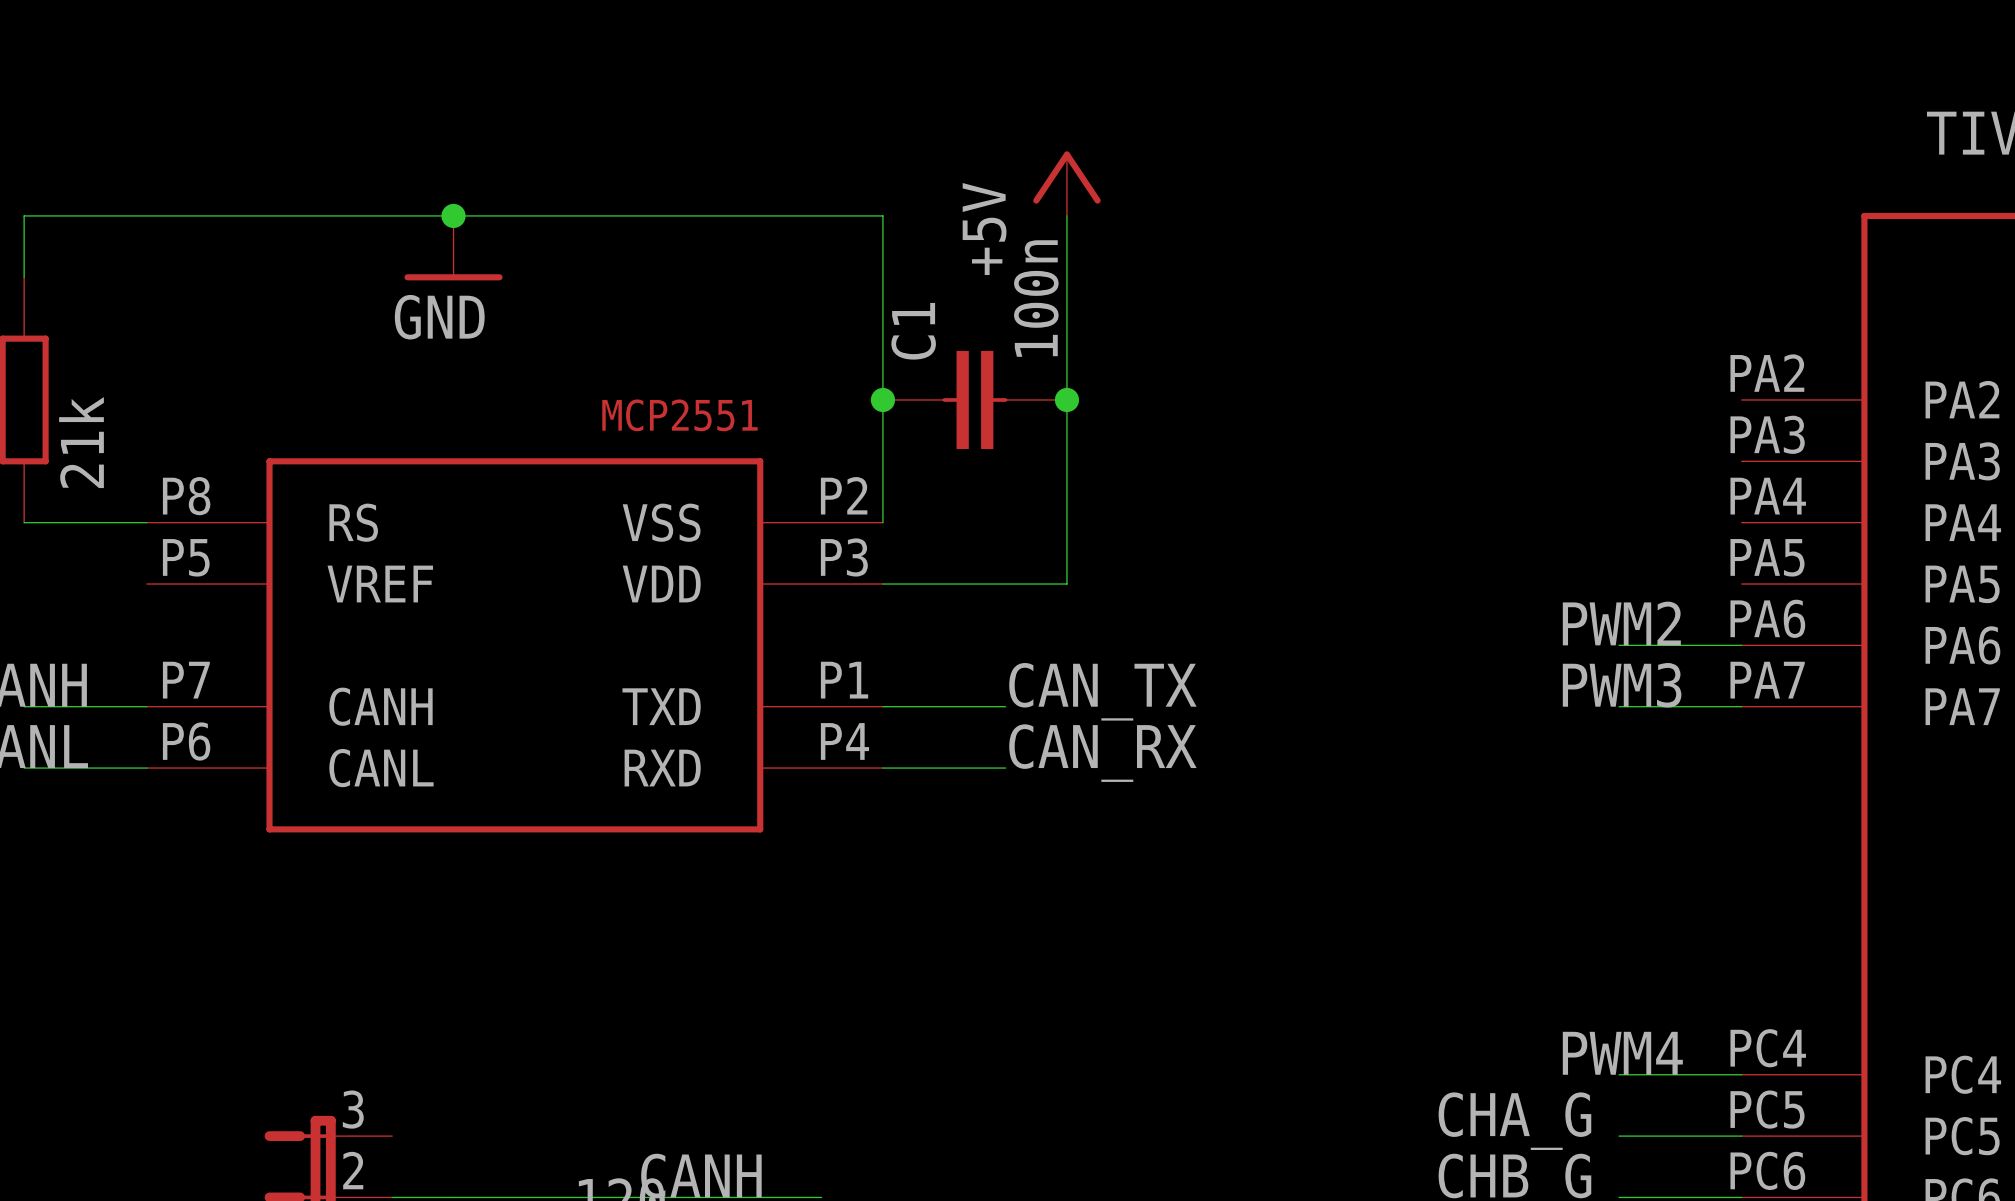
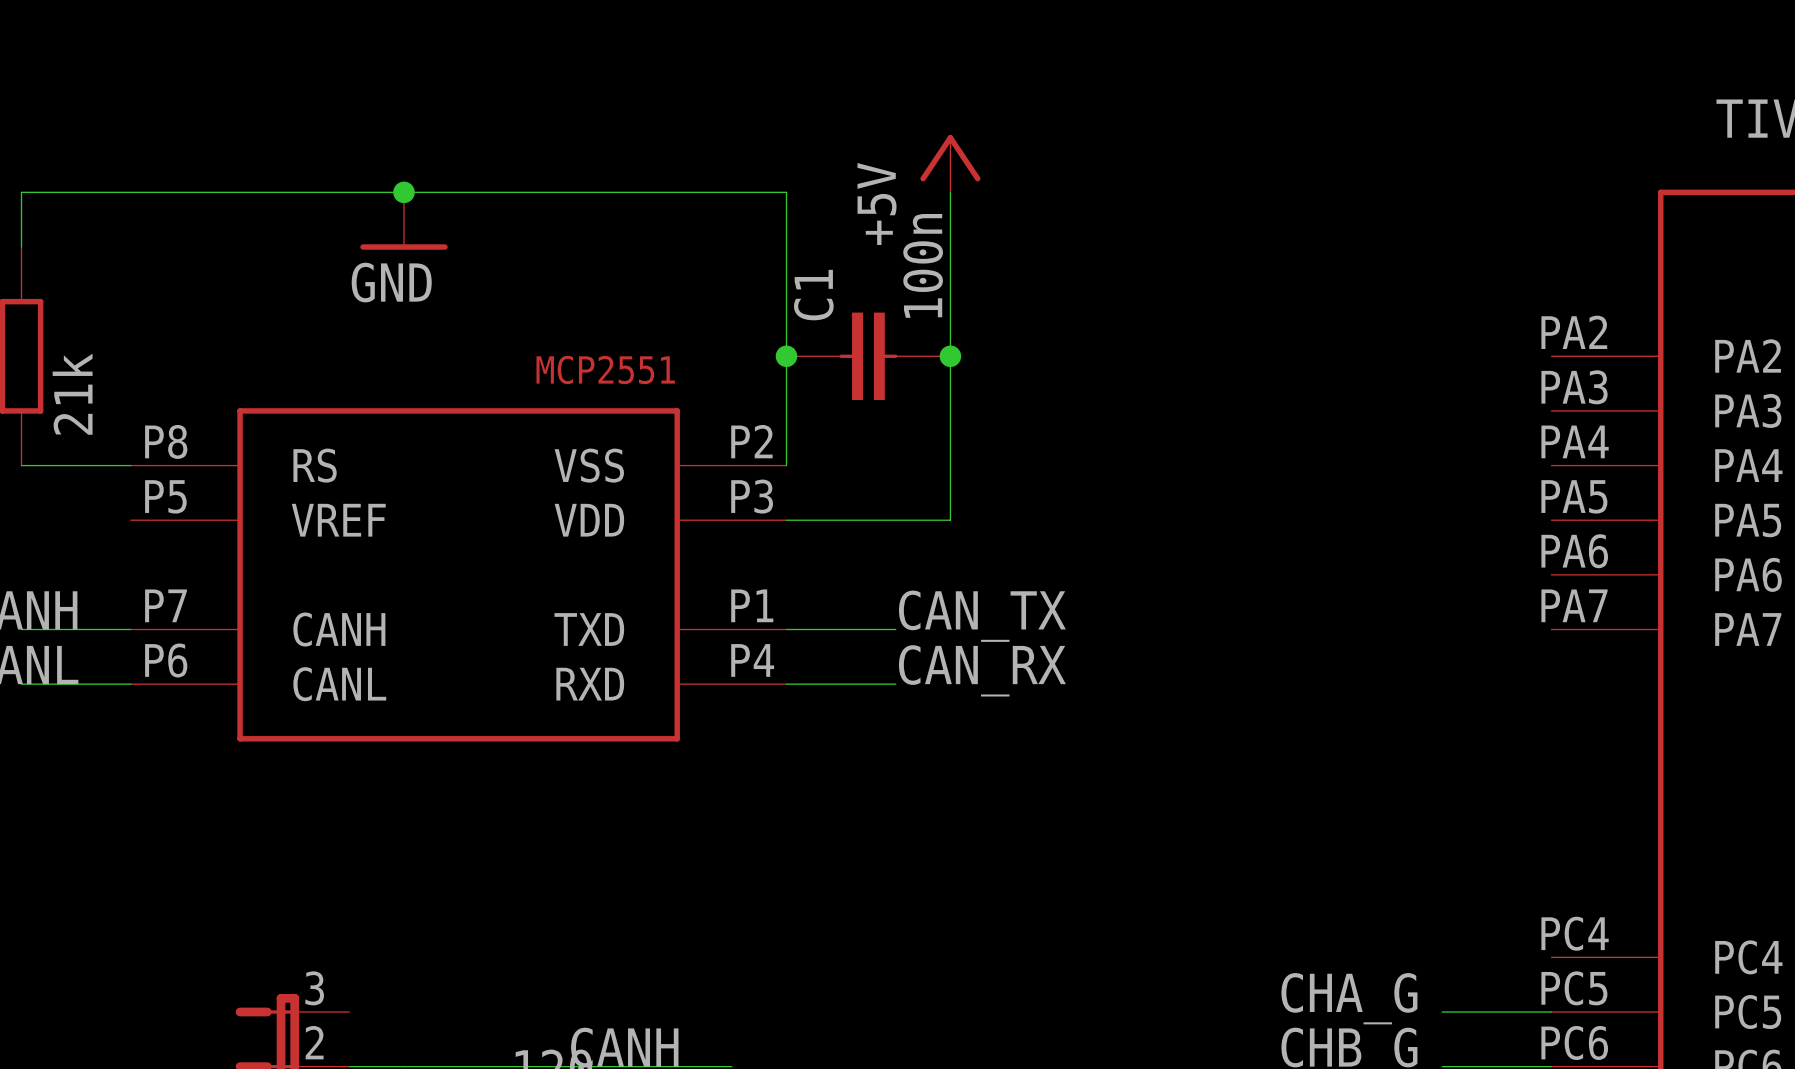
label: PWM2 (1621, 623) -> none
wire: (1619, 645) (1741, 645) -> none
label: PWM3 (1622, 685) -> none
wire: (1619, 706) (1741, 706) -> none
label: PWM4 (1622, 1053) -> none
wire: (1619, 1074) (1741, 1074) -> none

